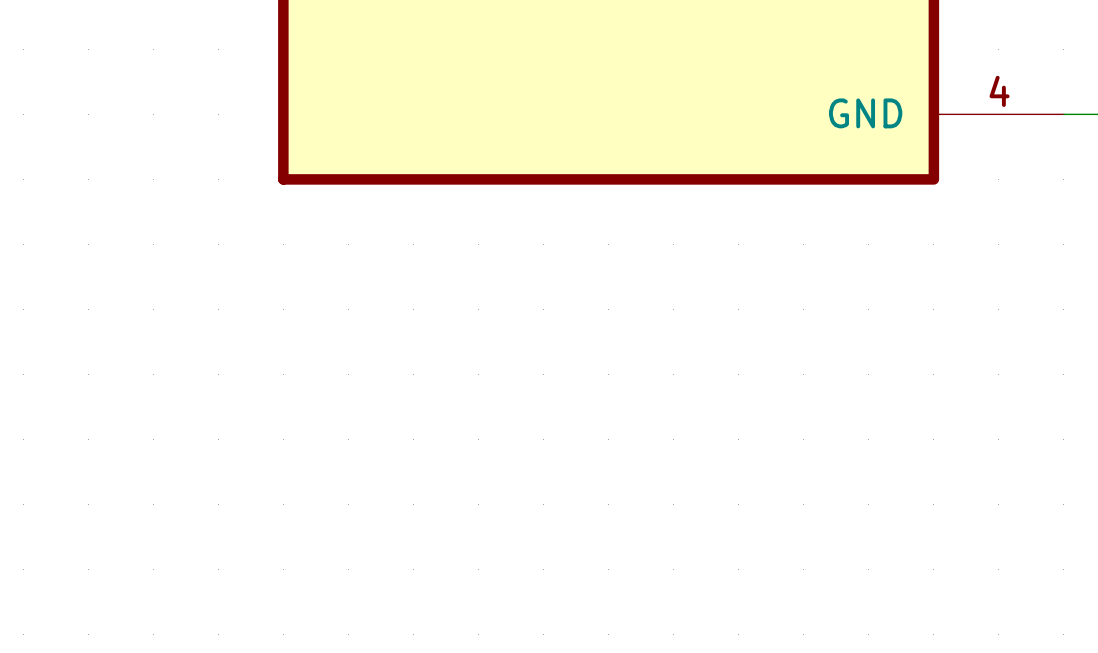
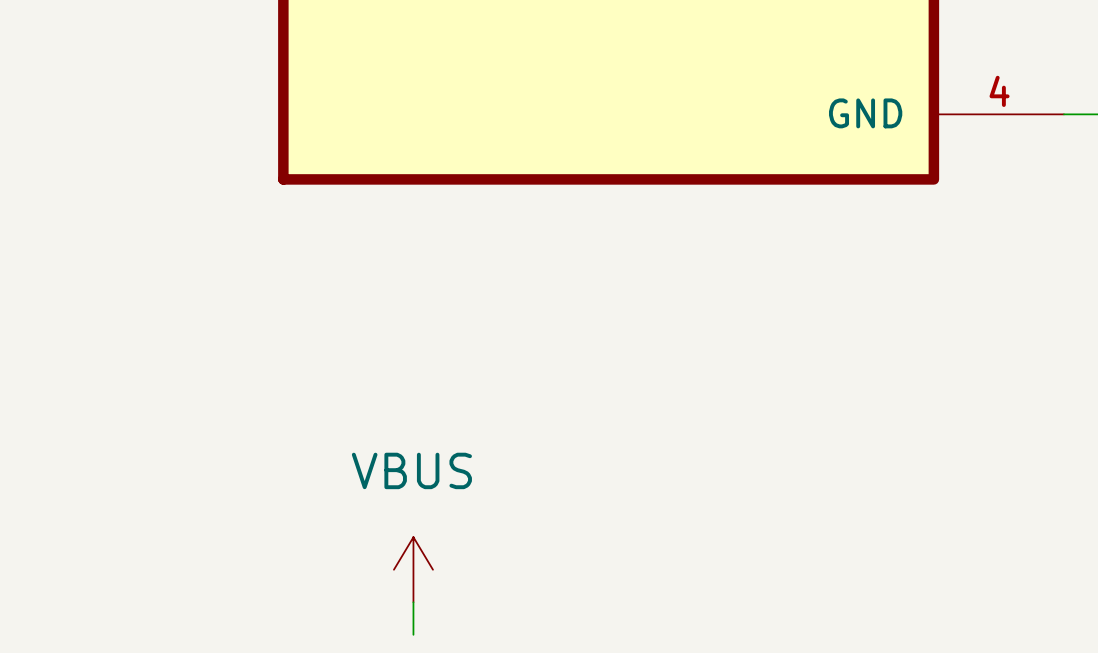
power symbol: none -> VBUS (413, 569)
wire: none -> (413, 602) (413, 634)

